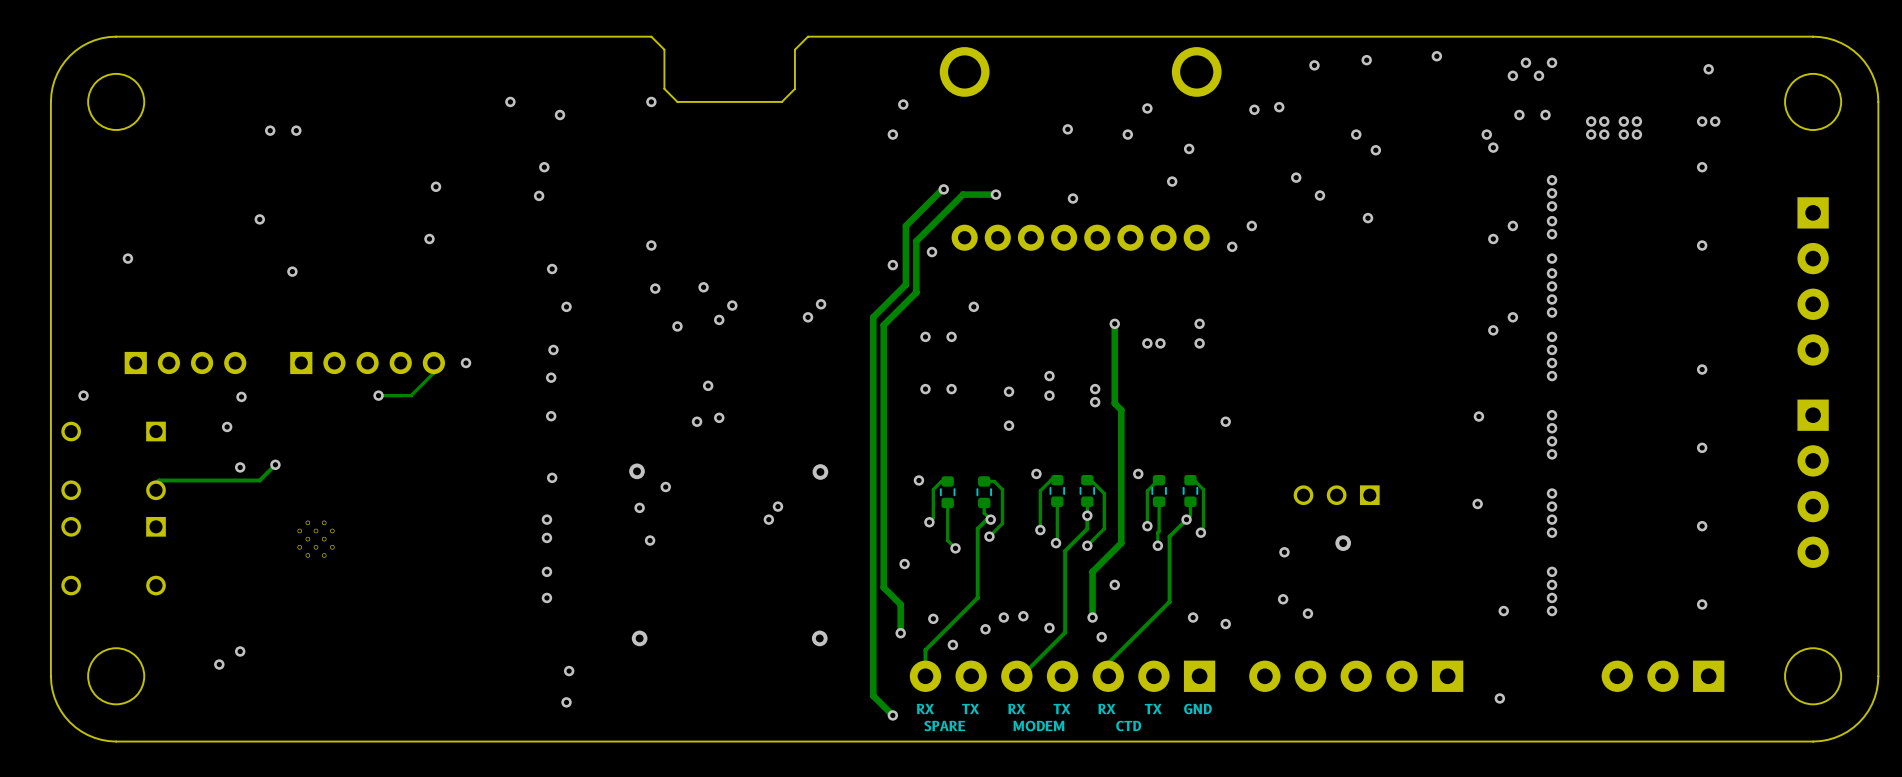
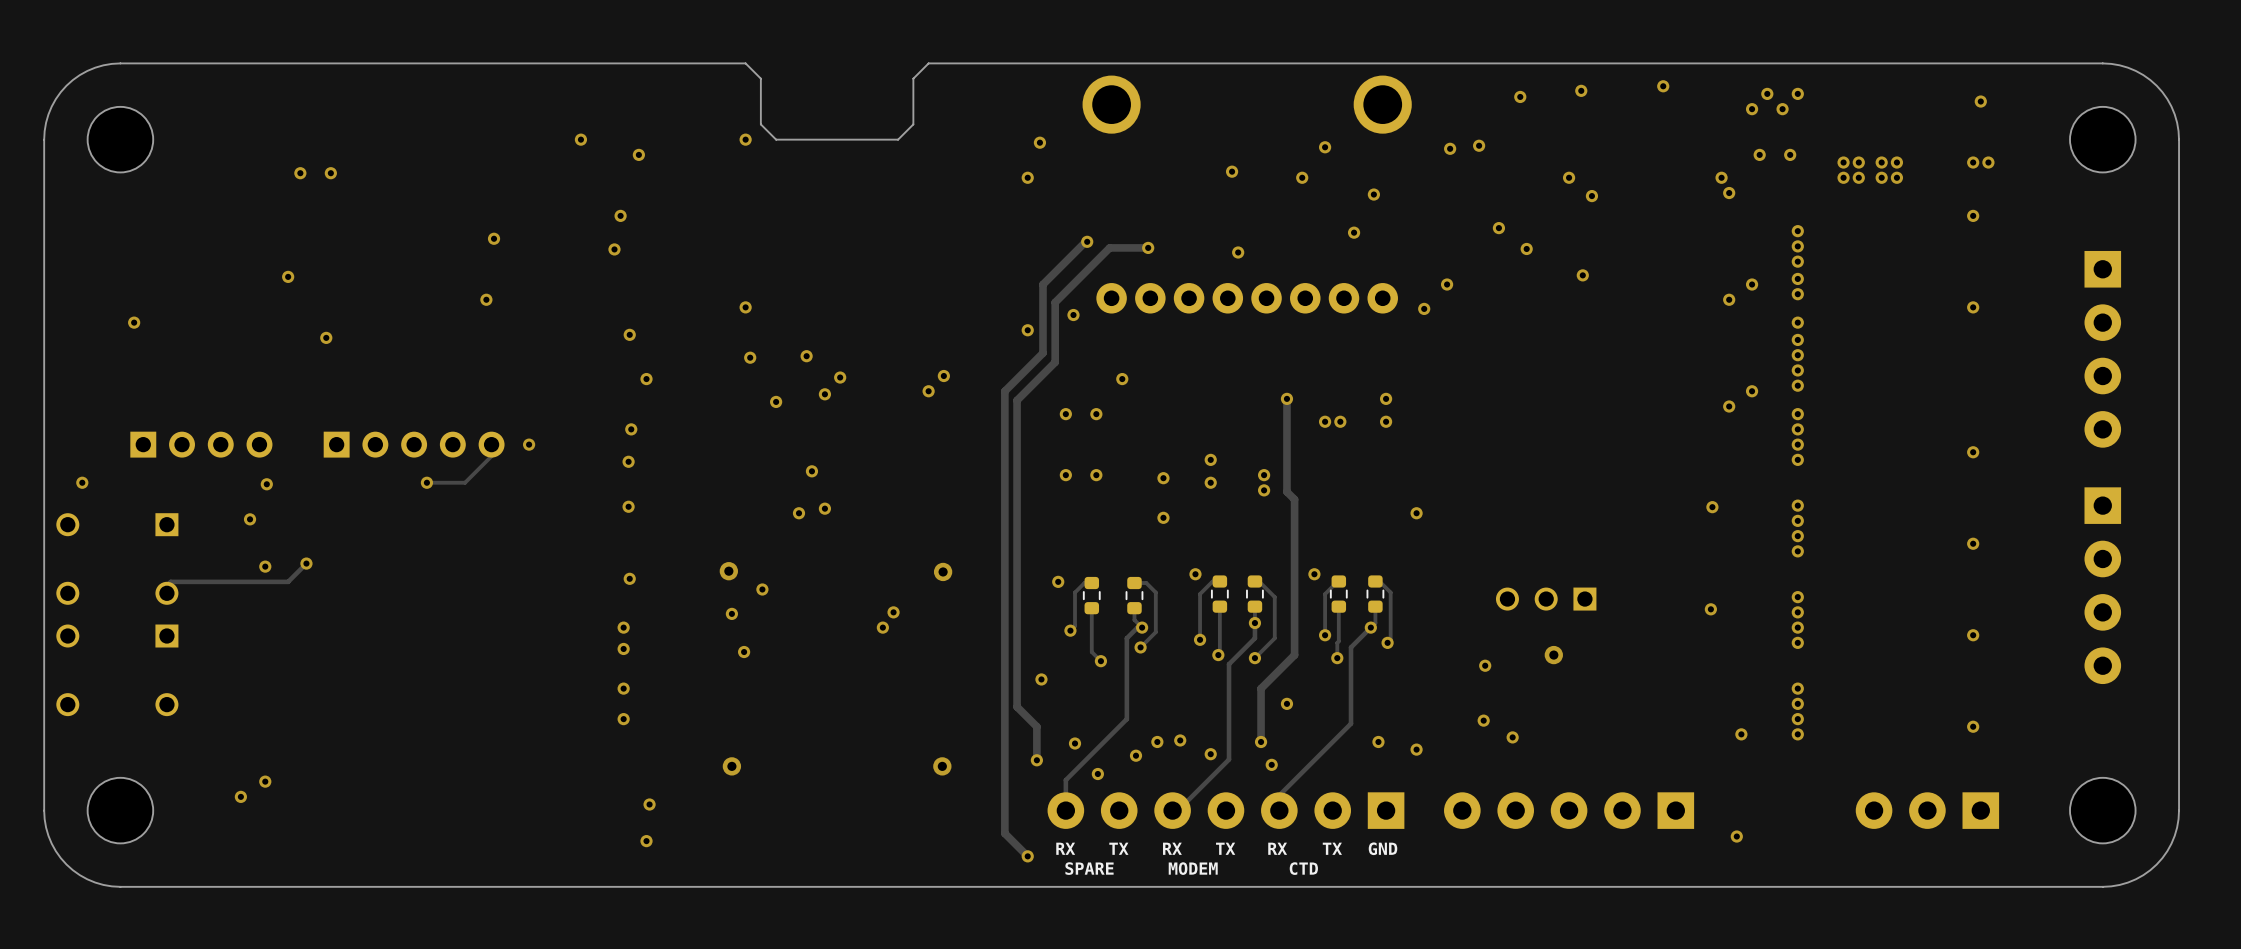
part: (316, 539) -> none

